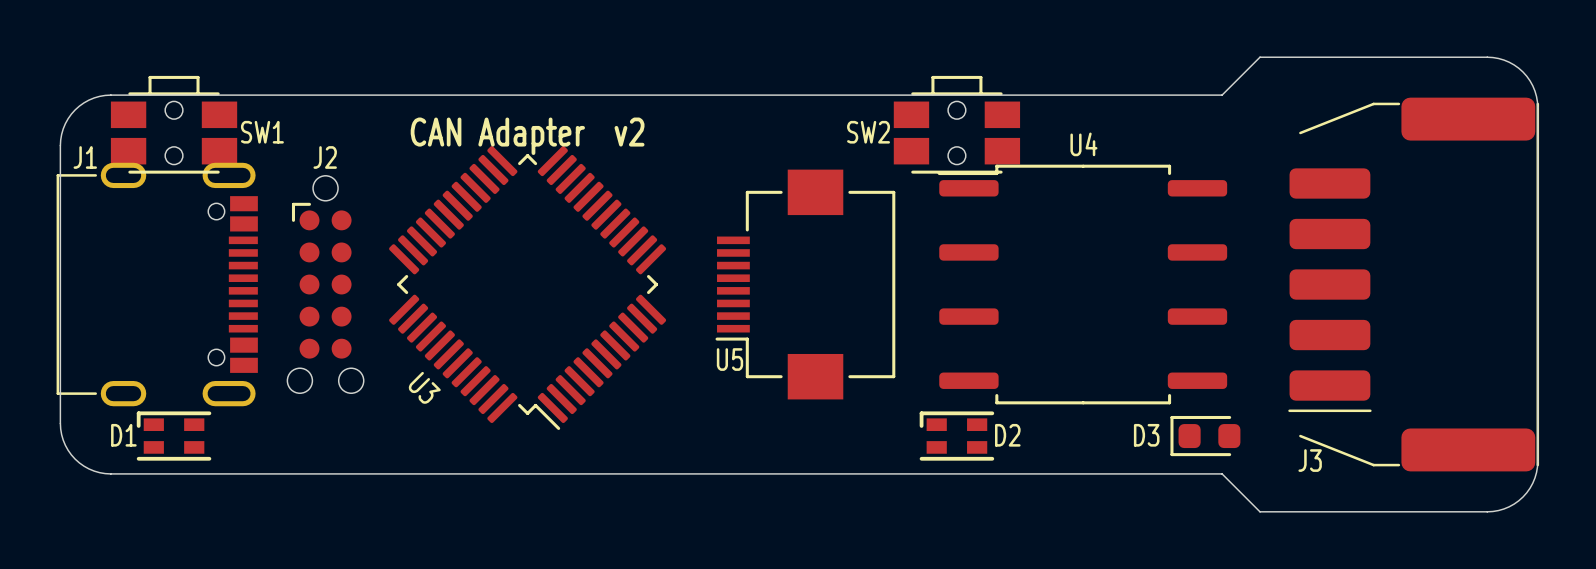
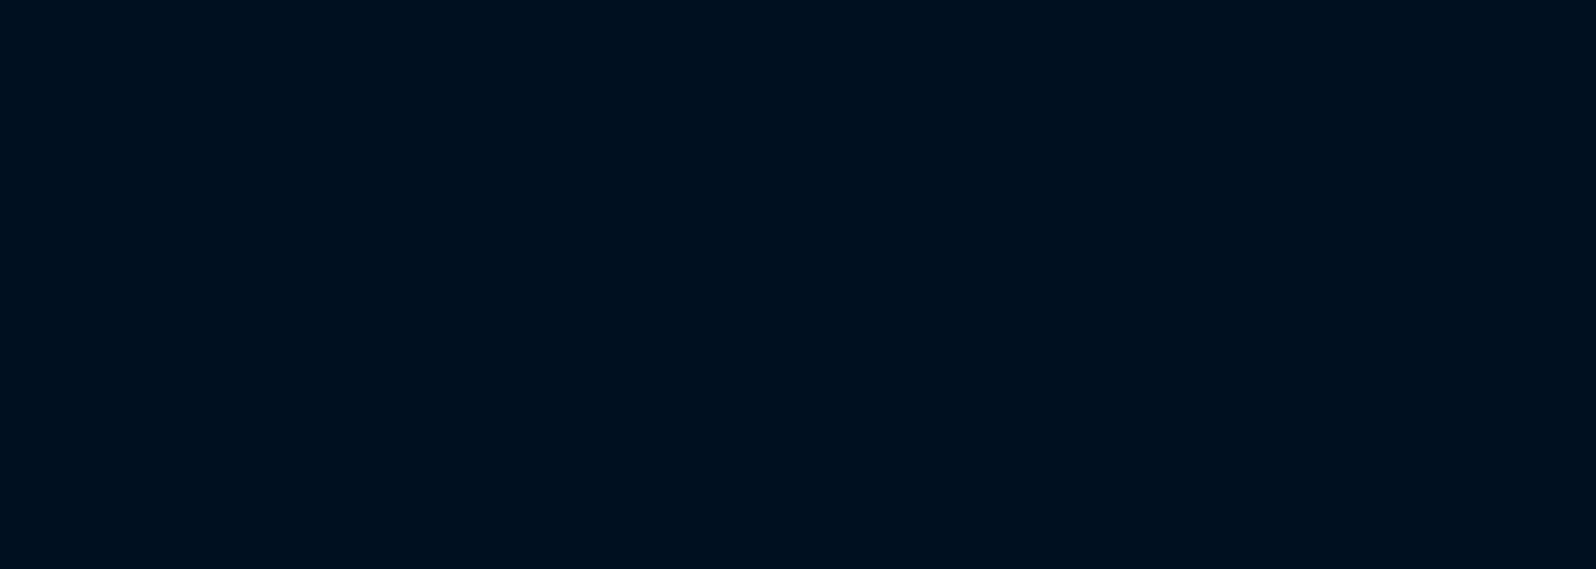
board edge: (1259, 57) (1222, 95) (110, 95) (94, 97) (79, 106) (71, 114) (65, 123) (60, 139) (60, 423) (63, 440) (71, 454) (79, 462) (94, 471) (110, 473) (1222, 473) (1259, 511) (1487, 511) (1503, 508) (1514, 504) (1530, 488) (1534, 477) (1537, 461) (1537, 107) (1536, 96) (1530, 80) (1514, 64) (1492, 57) (1259, 57) -> none
SW1: (174, 124) -> none
SW2: (956, 124) -> none
text: CAN Adapter v2 (527, 136) -> none
J1: (157, 284) -> none
J2: (325, 284) -> none
U5: (805, 284) -> none
U4: (1082, 284) -> none
J3: (1413, 284) -> none
U3: (527, 287) -> none
D1: (174, 436) -> none
D2: (956, 436) -> none
D3: (1205, 436) -> none

